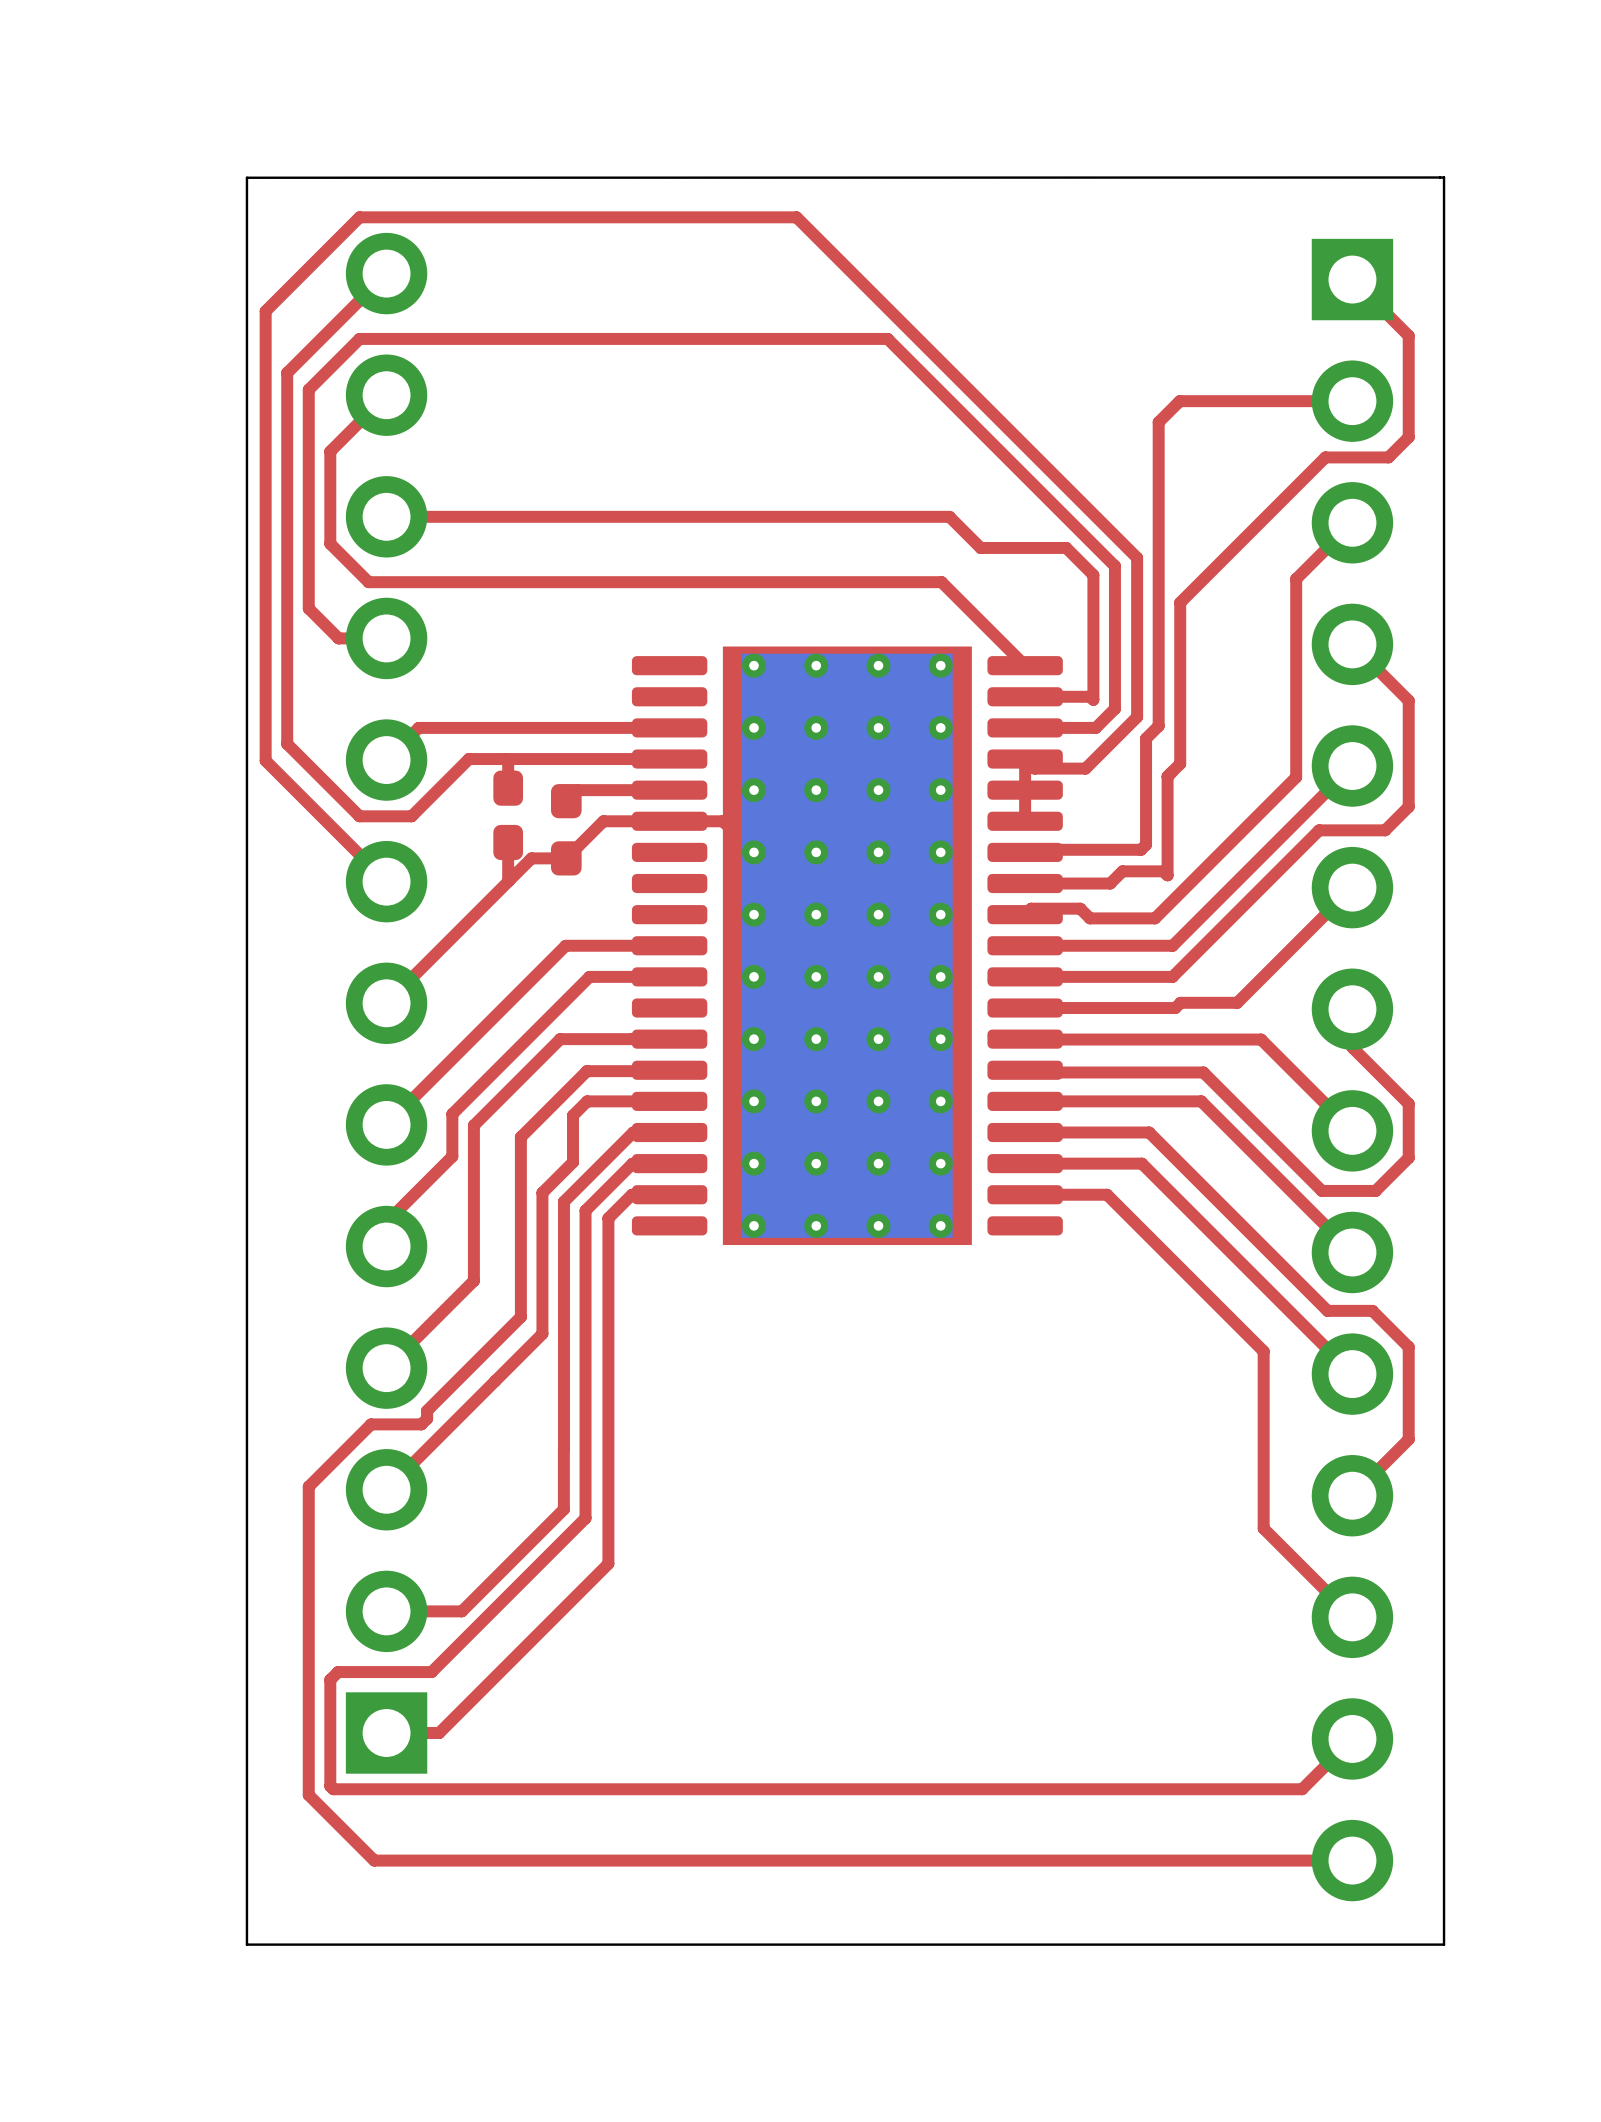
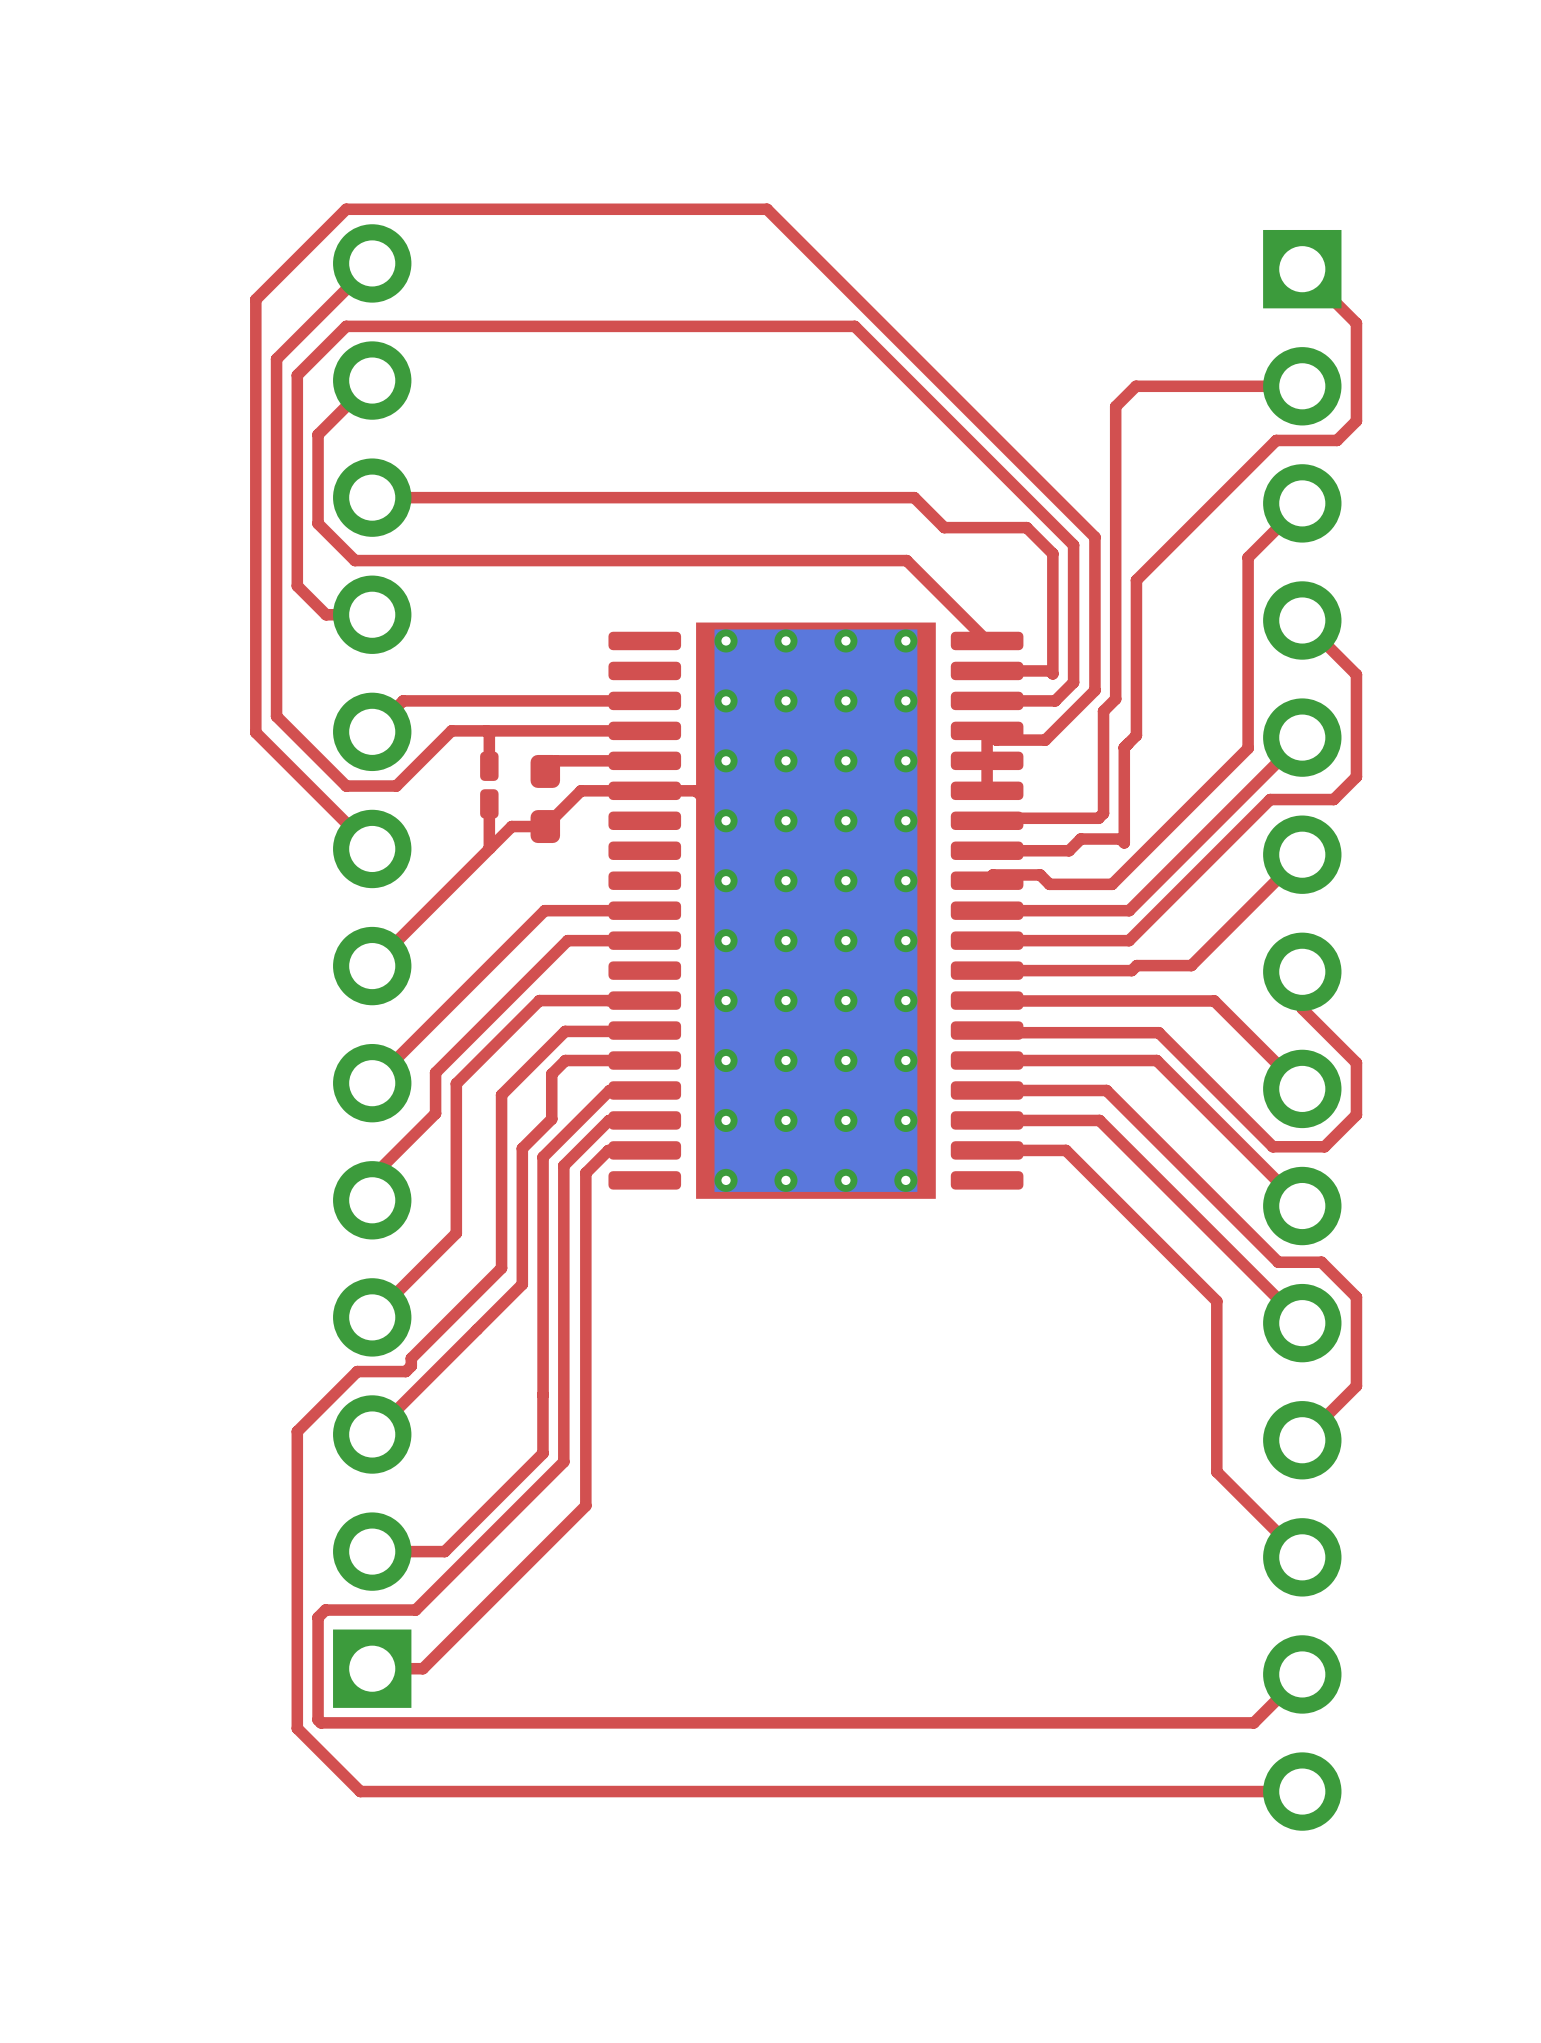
board edge: (1444, 177) (246, 177) (246, 1944) (1444, 1944) (1444, 177) -> none
part footprint: [493, 770, 524, 861] -> [480, 751, 499, 819]

